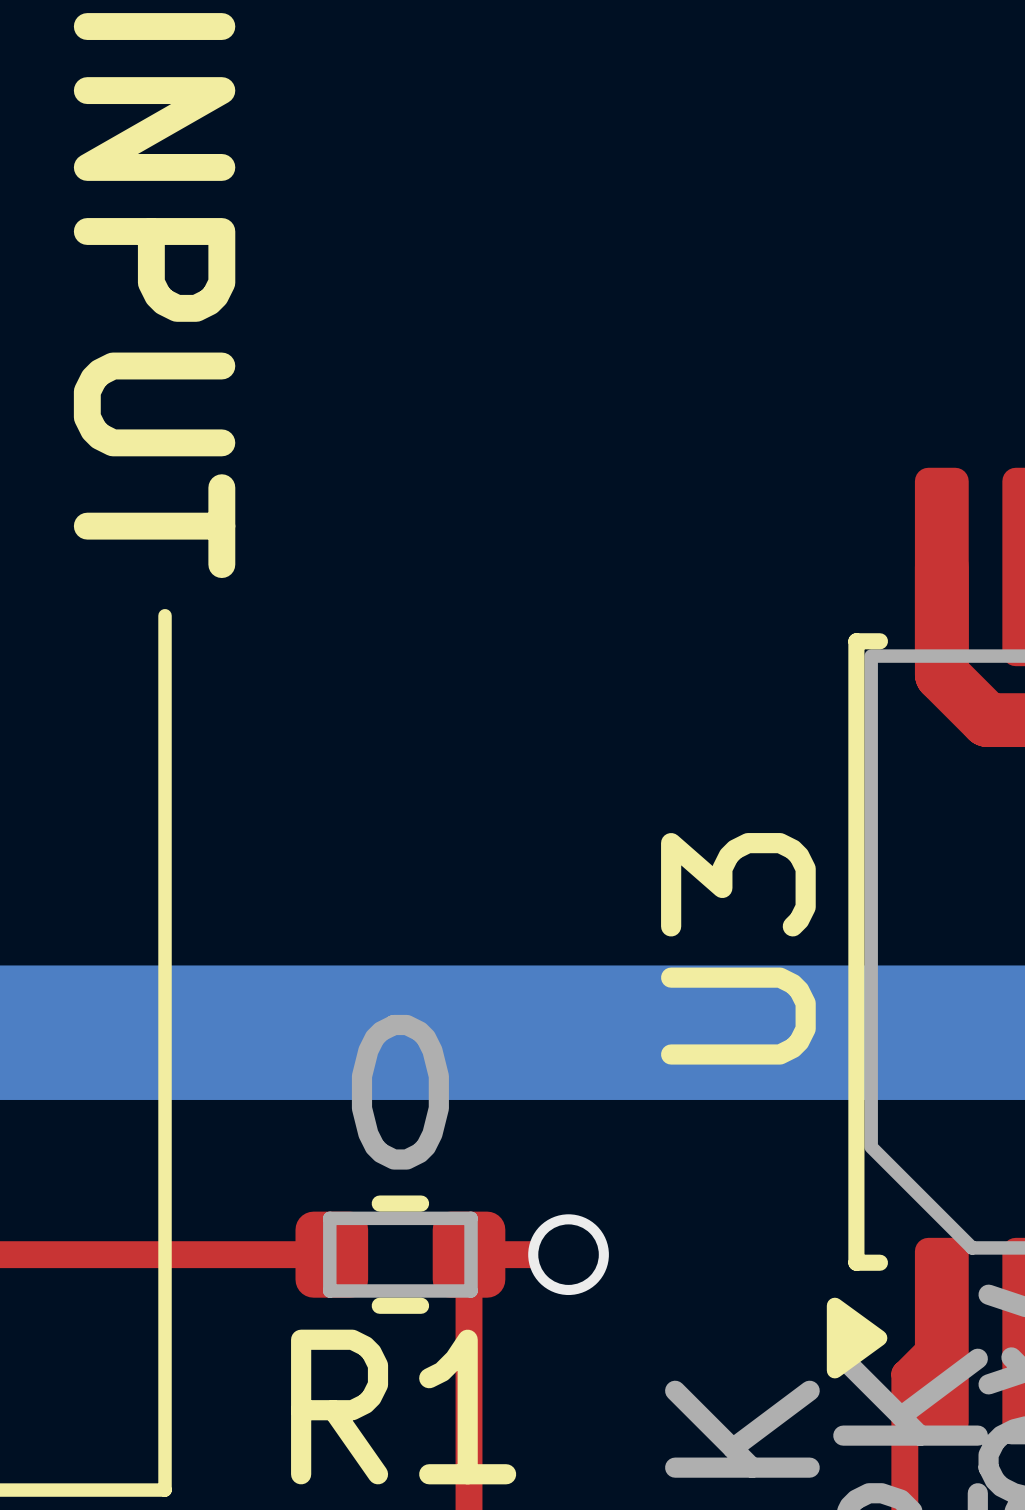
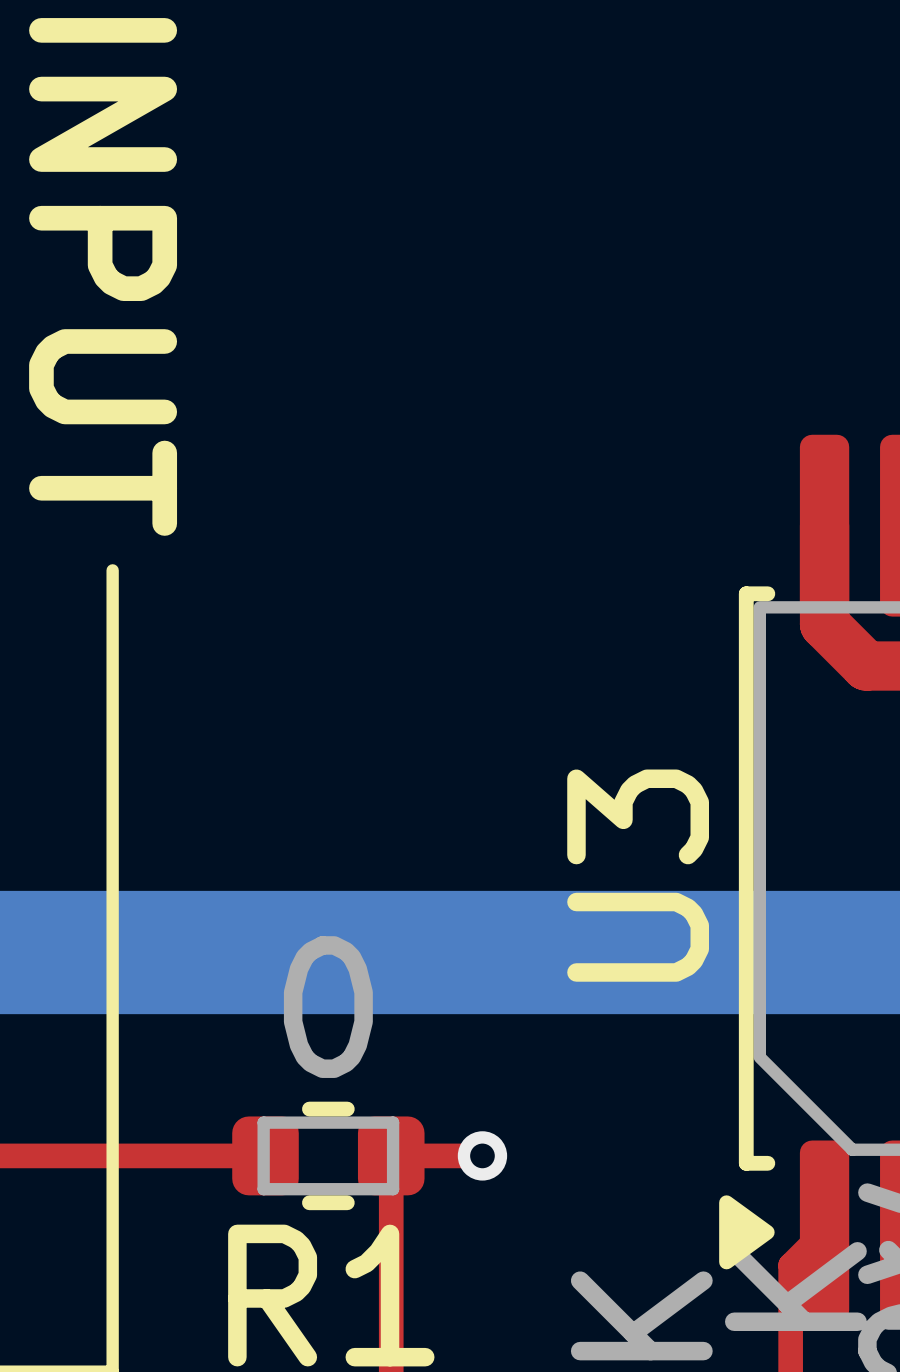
via size: [528, 1214, 609, 1296] -> [457, 1131, 508, 1181]

